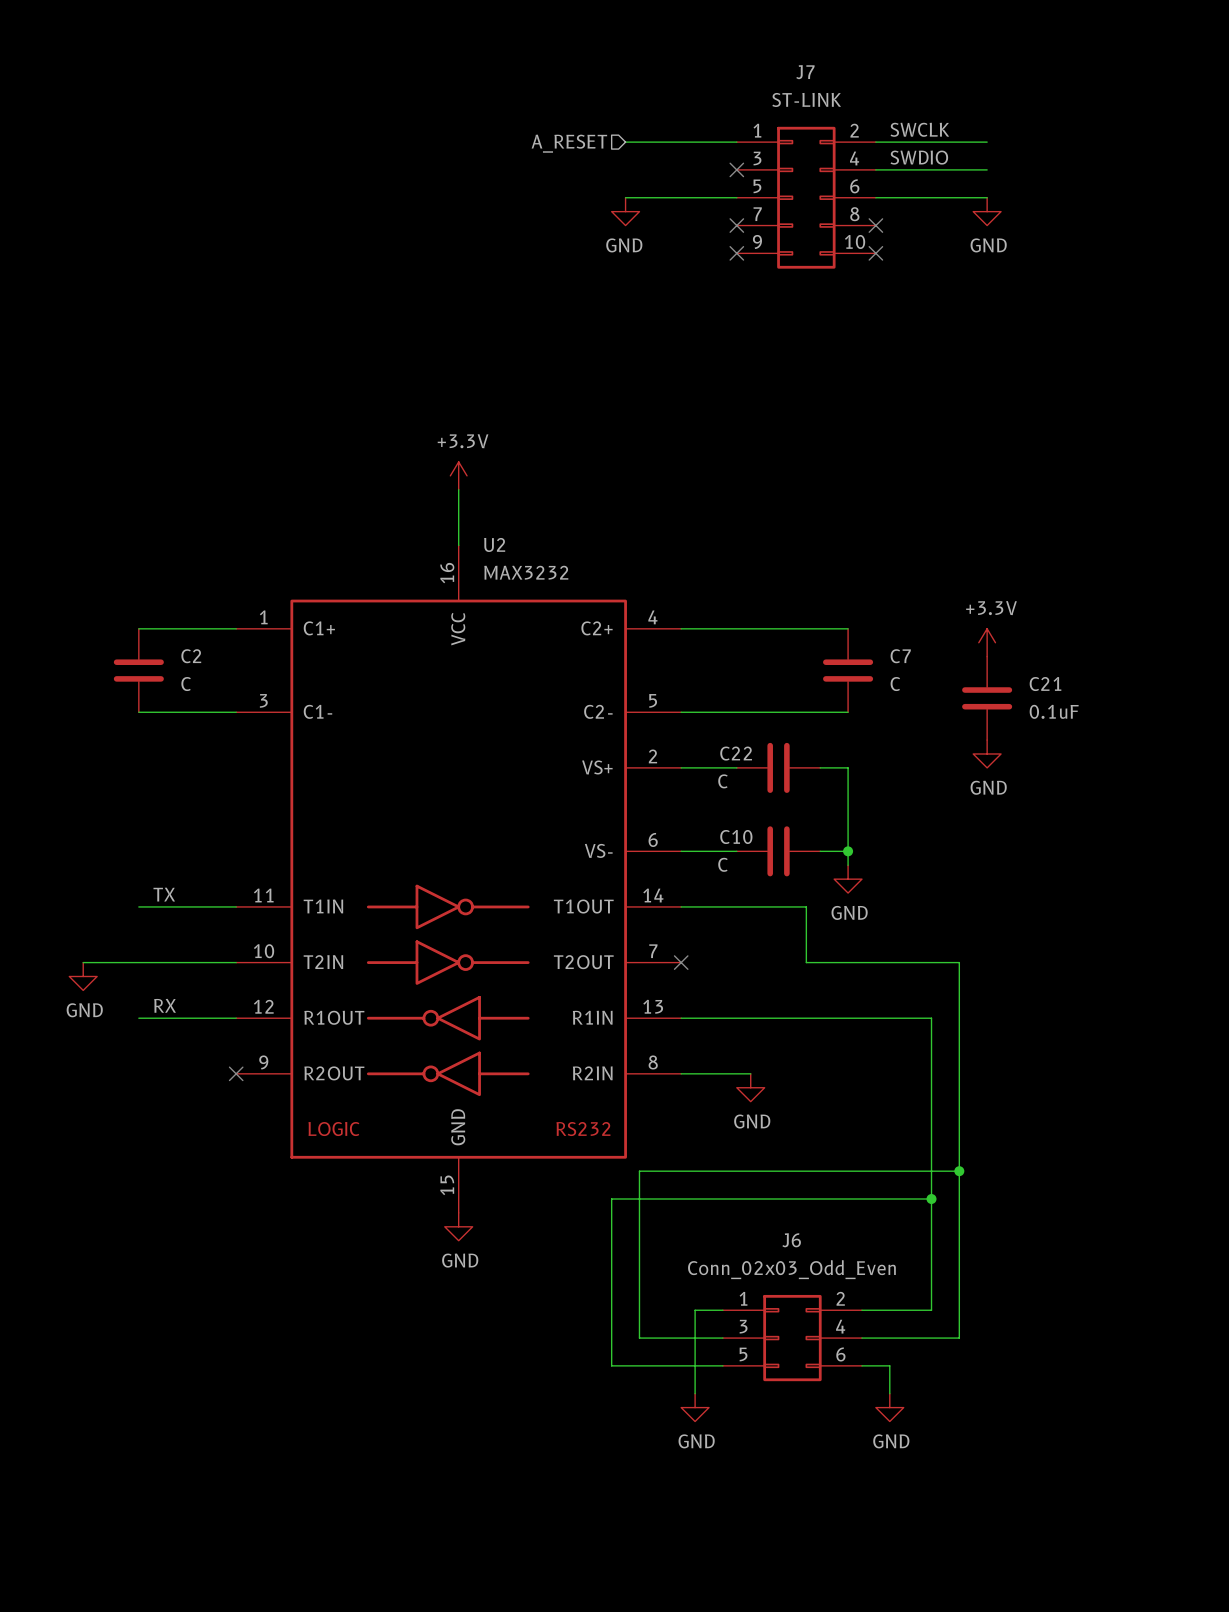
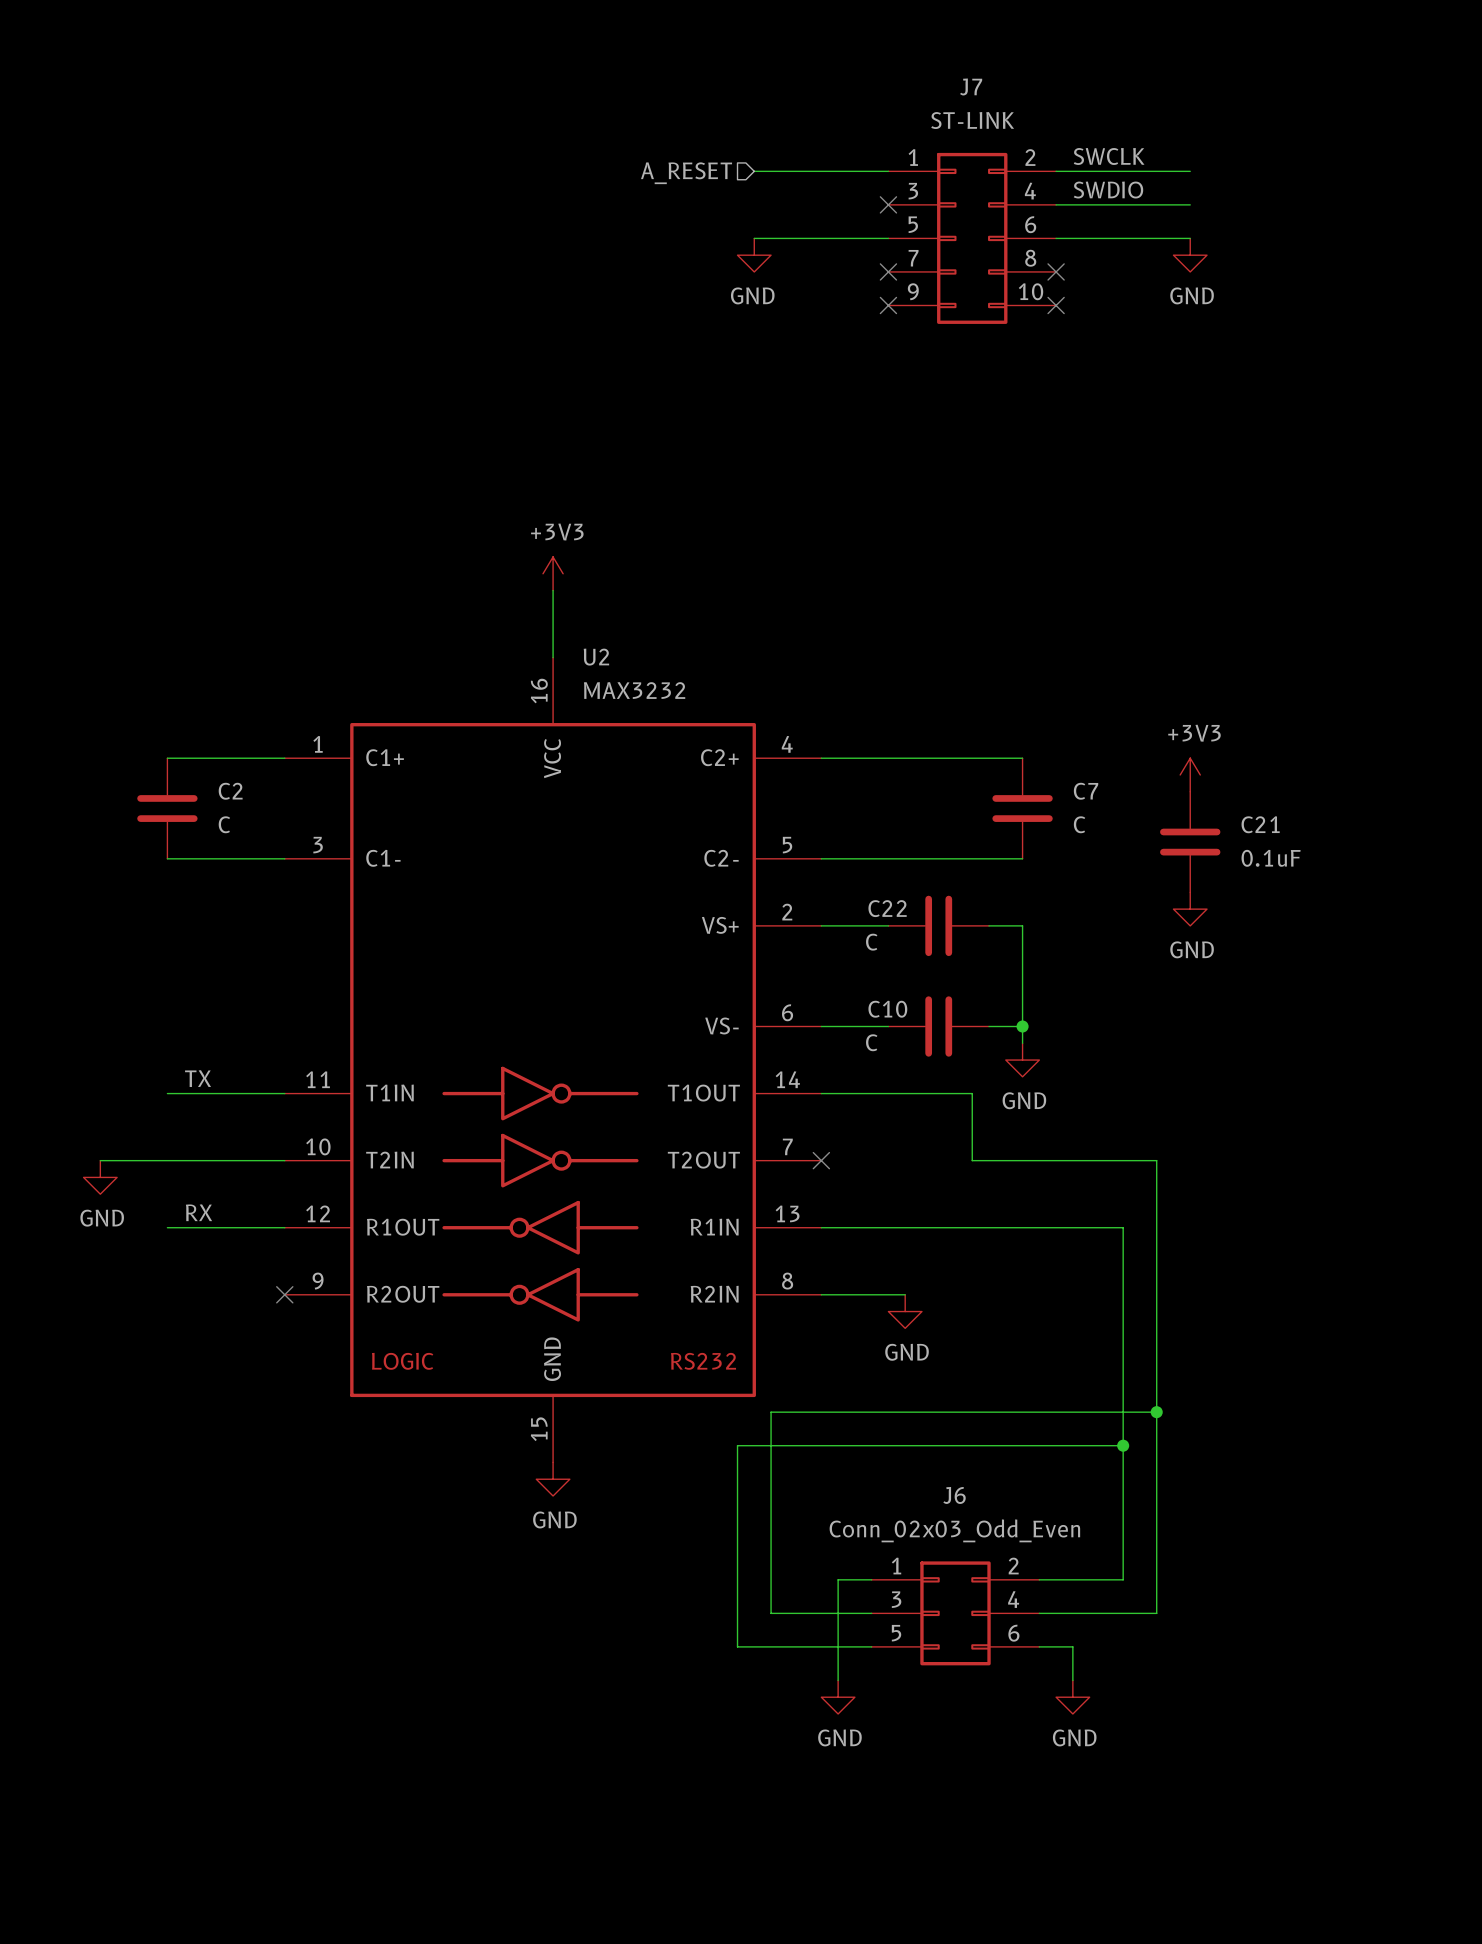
power symbol: +3.3V (458, 475) -> +3V3 (553, 573)
power symbol: +3.3V (987, 642) -> +3V3 (1190, 774)

